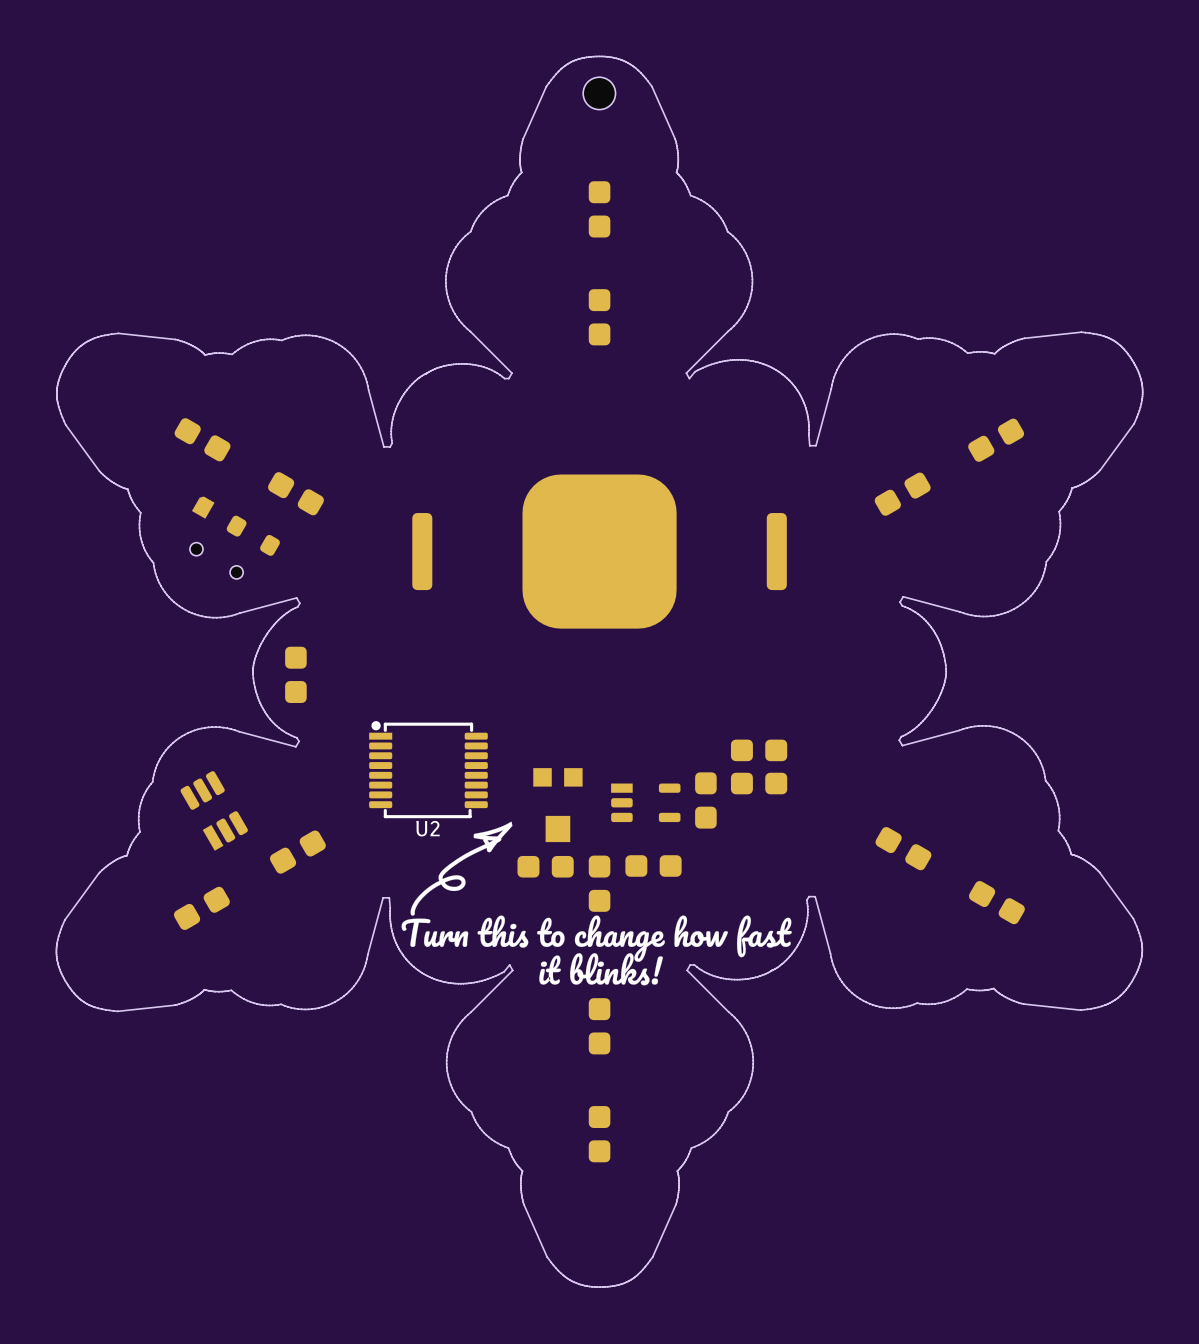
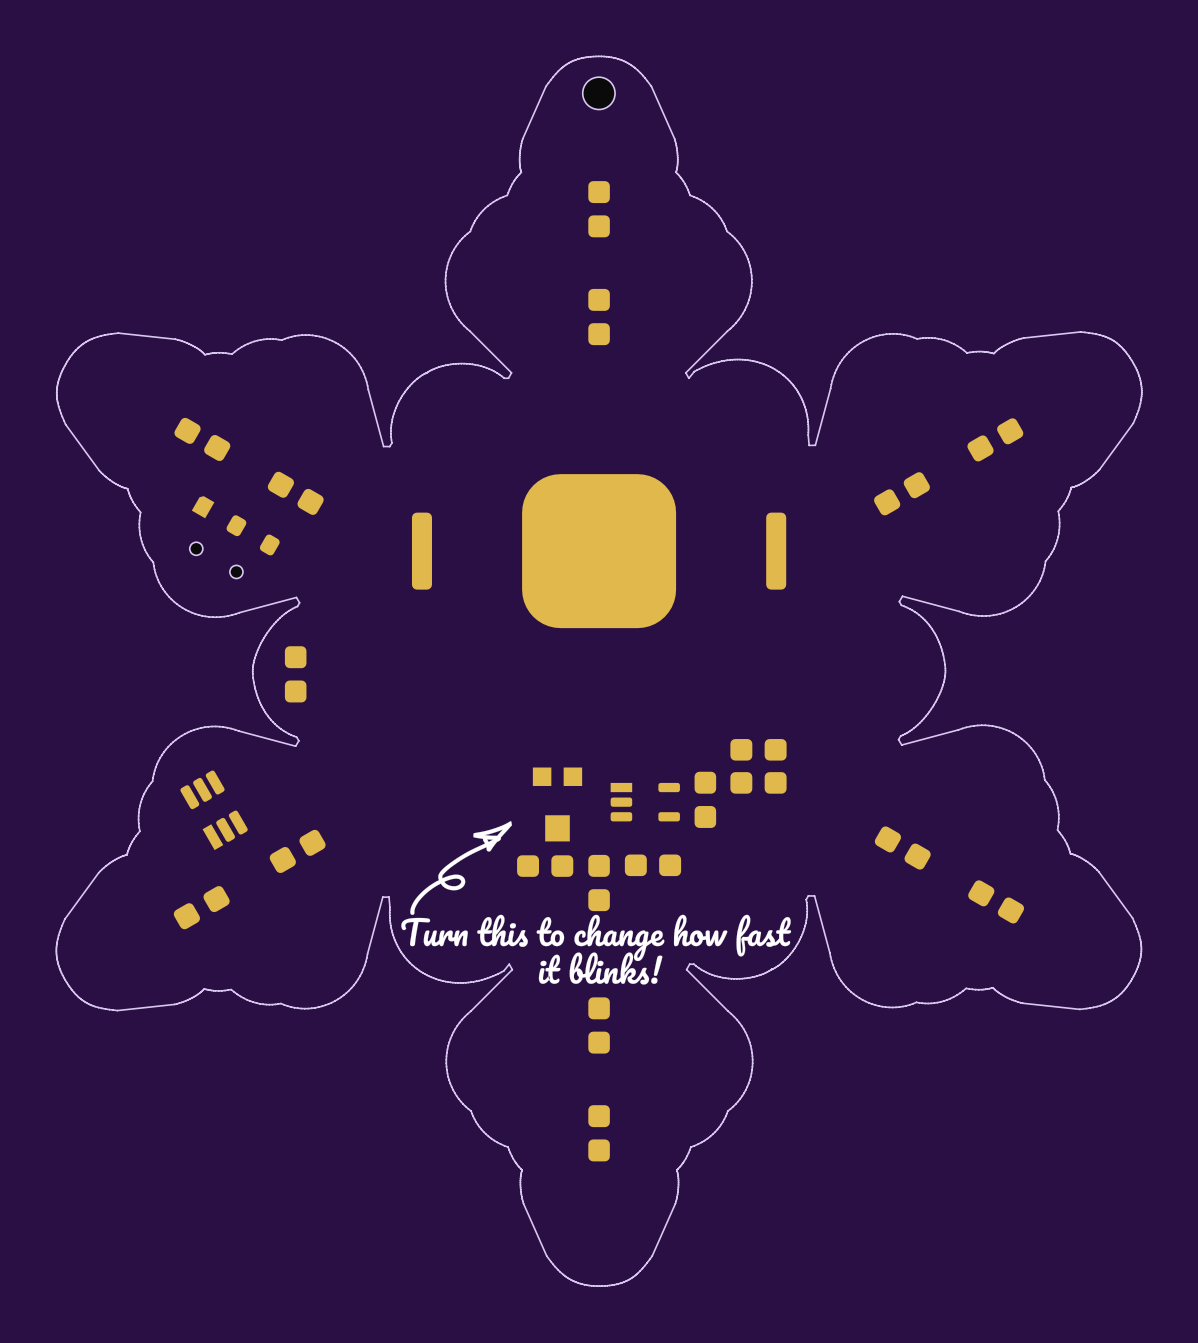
U2: (428, 769) -> none

